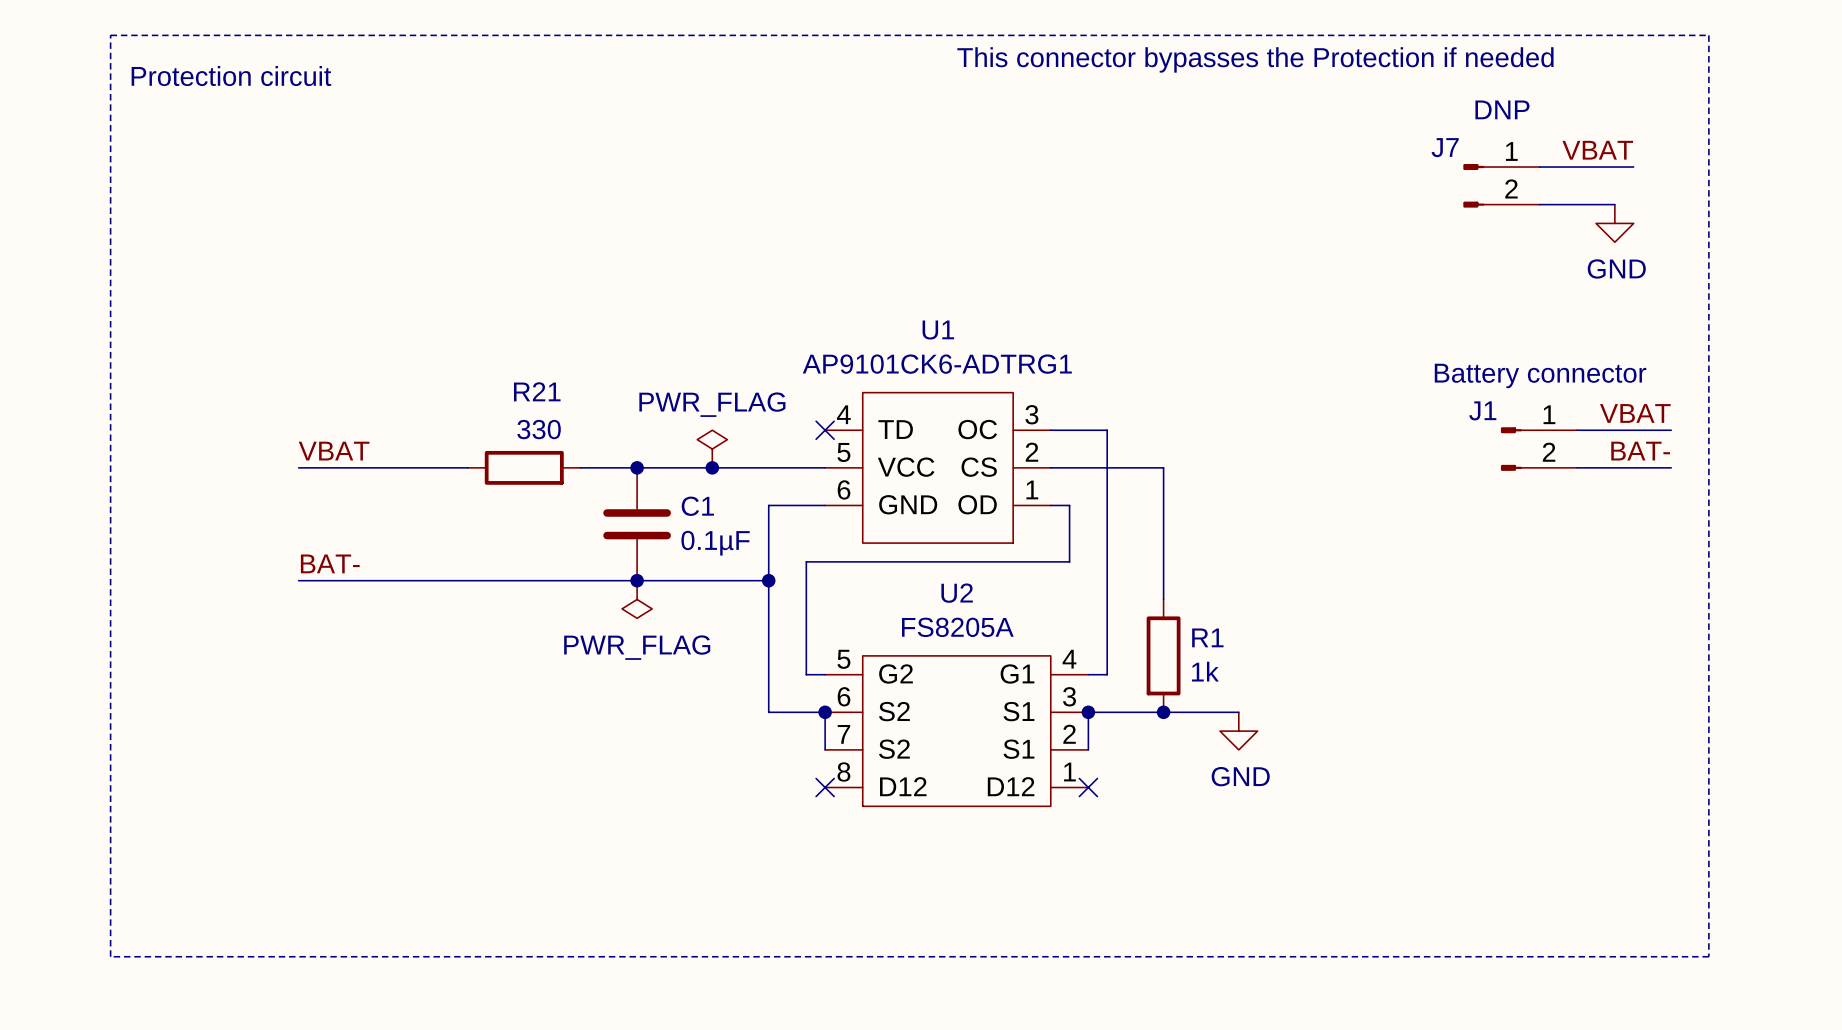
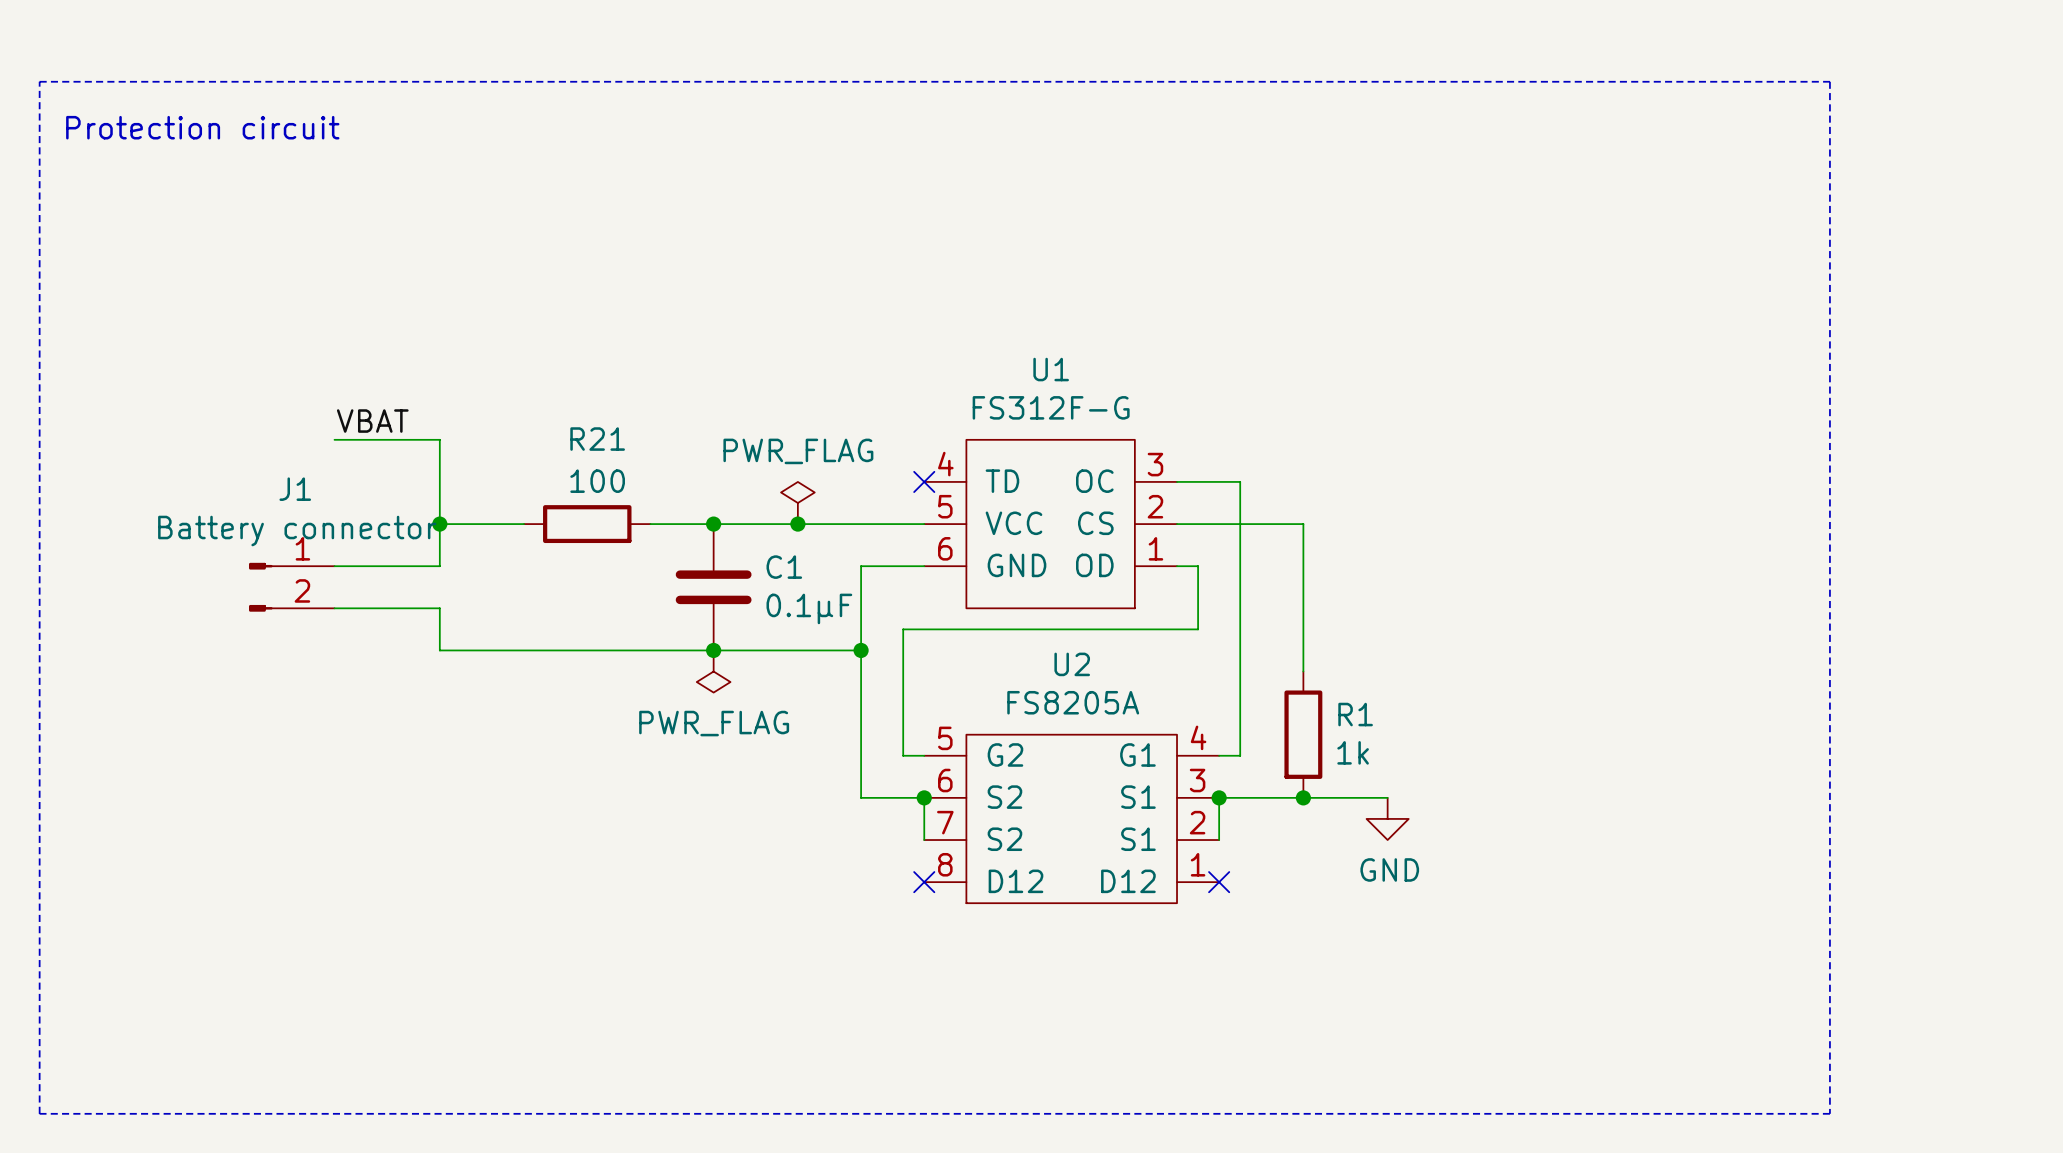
line: (110, 35) (110, 956) (1708, 956) (1708, 35) (110, 35) -> (39, 81) (39, 1113) (1829, 1113) (1829, 81) (39, 81)
text: This connector bypasses the Protection if needed (1255, 59) -> none
text position: Protection circuit (231, 76) -> Protection circuit (202, 127)
label: VBAT (1597, 150) -> none
wire: (1539, 167) (1633, 167) -> none
J7: DNP (1501, 185) -> none
wire: (1539, 204) (1614, 204) -> none
power symbol: GND (1614, 223) -> none
U1 value: AP9101CK6-ADTRG1 (937, 364) -> FS312F-G (1051, 407)
J1 value position: Battery connector (1540, 375) -> Battery connector (297, 531)
wire: none -> (334, 439) (439, 439) (439, 566) (334, 566)
J1 name position: J1 (1482, 410) -> J1 (295, 489)
label: VBAT (1635, 413) -> none
R21 value: 330 (539, 429) -> 100 (597, 481)
wire: (1577, 430) (1671, 430) -> none
J1 position: (1539, 449) -> (291, 587)
label position: VBAT (334, 451) -> VBAT (372, 421)
label: BAT- (1640, 451) -> none
wire: (298, 467) (392, 467) -> none
junction: none -> (439, 524)
wire: (1577, 467) (1671, 467) -> none
label: BAT- (330, 563) -> none
wire: (298, 580) (392, 580) -> (334, 608) (439, 608) (439, 650)

